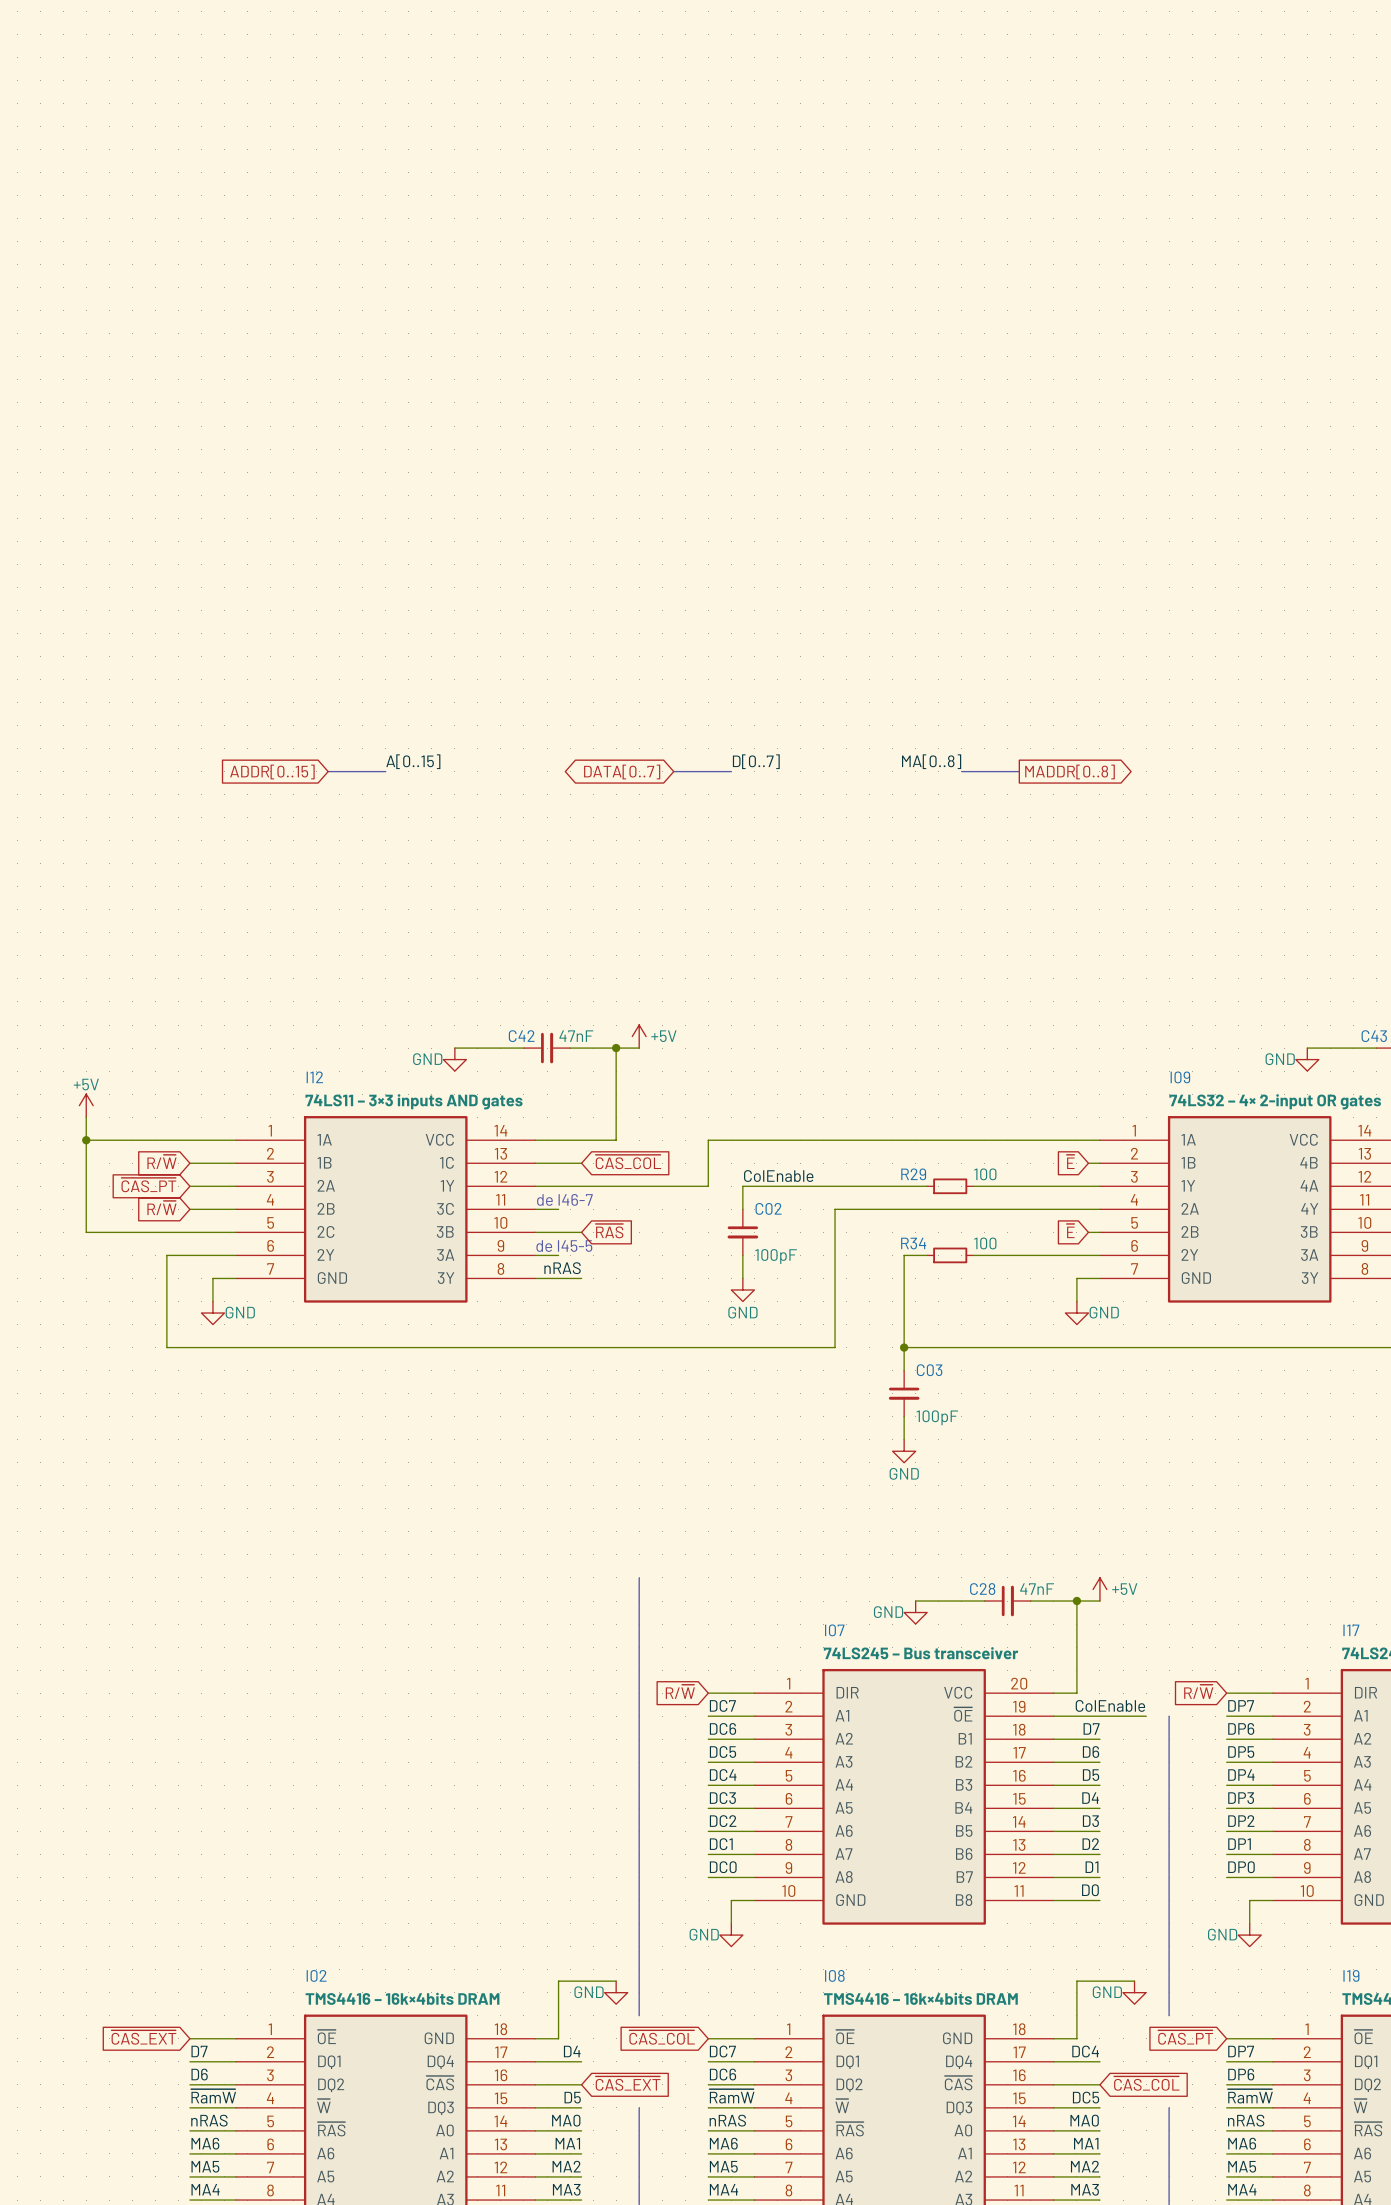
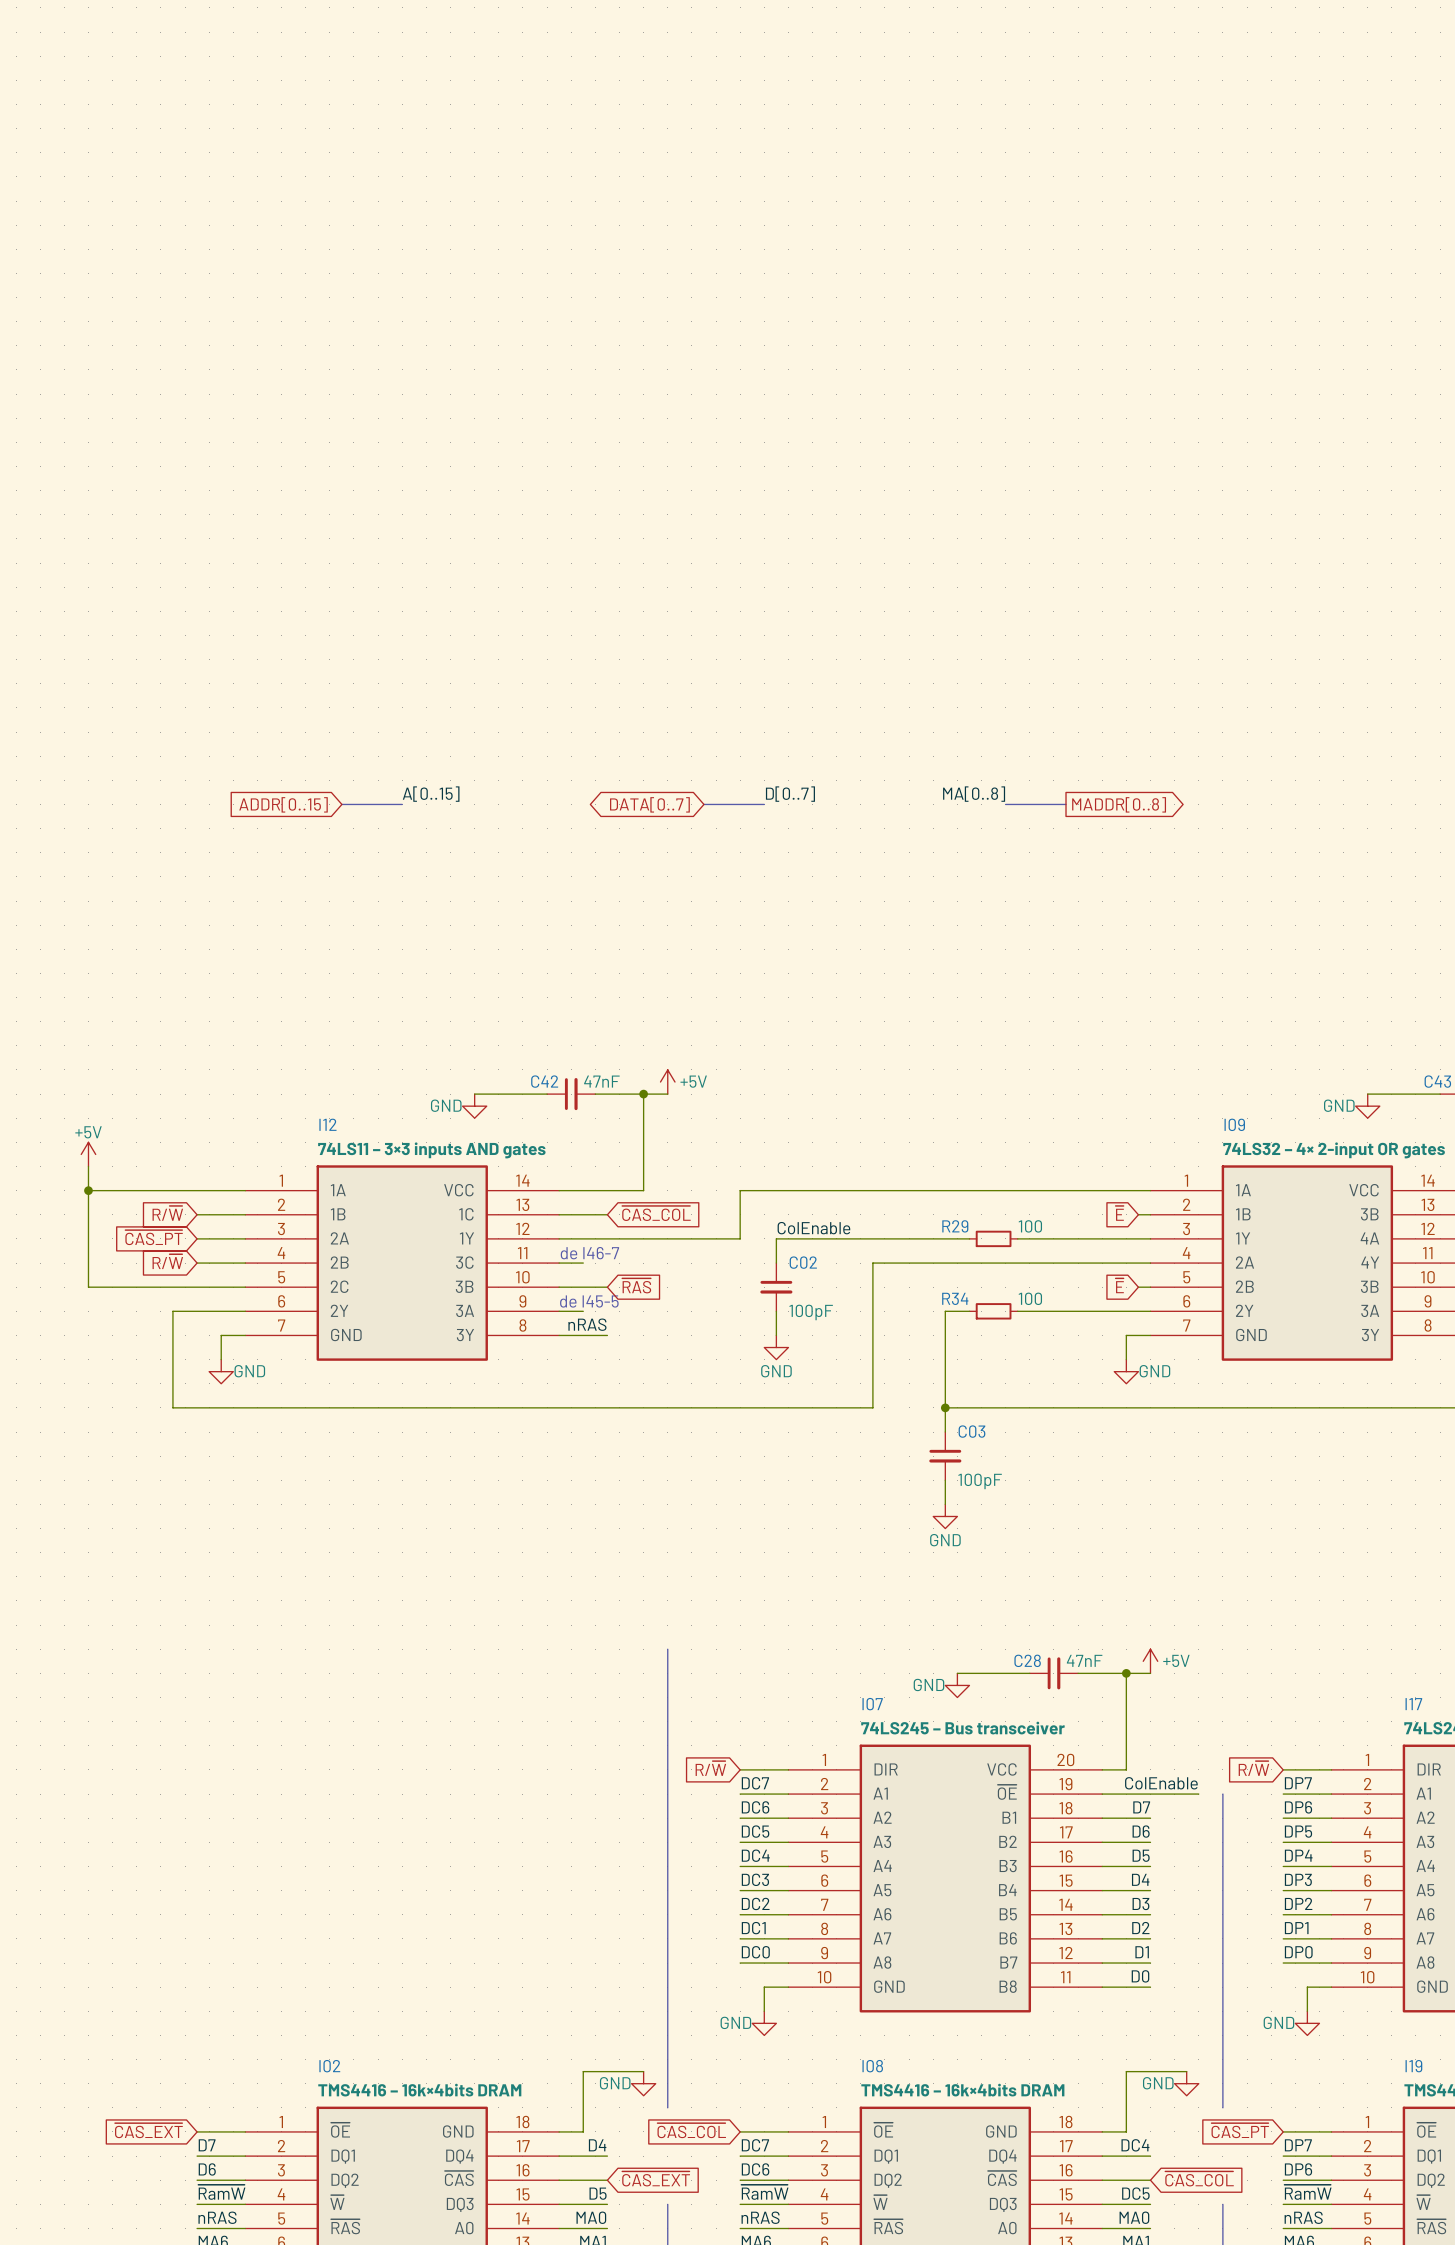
I09 pin name: 4B (1308, 1162) -> 3B (1369, 1214)

